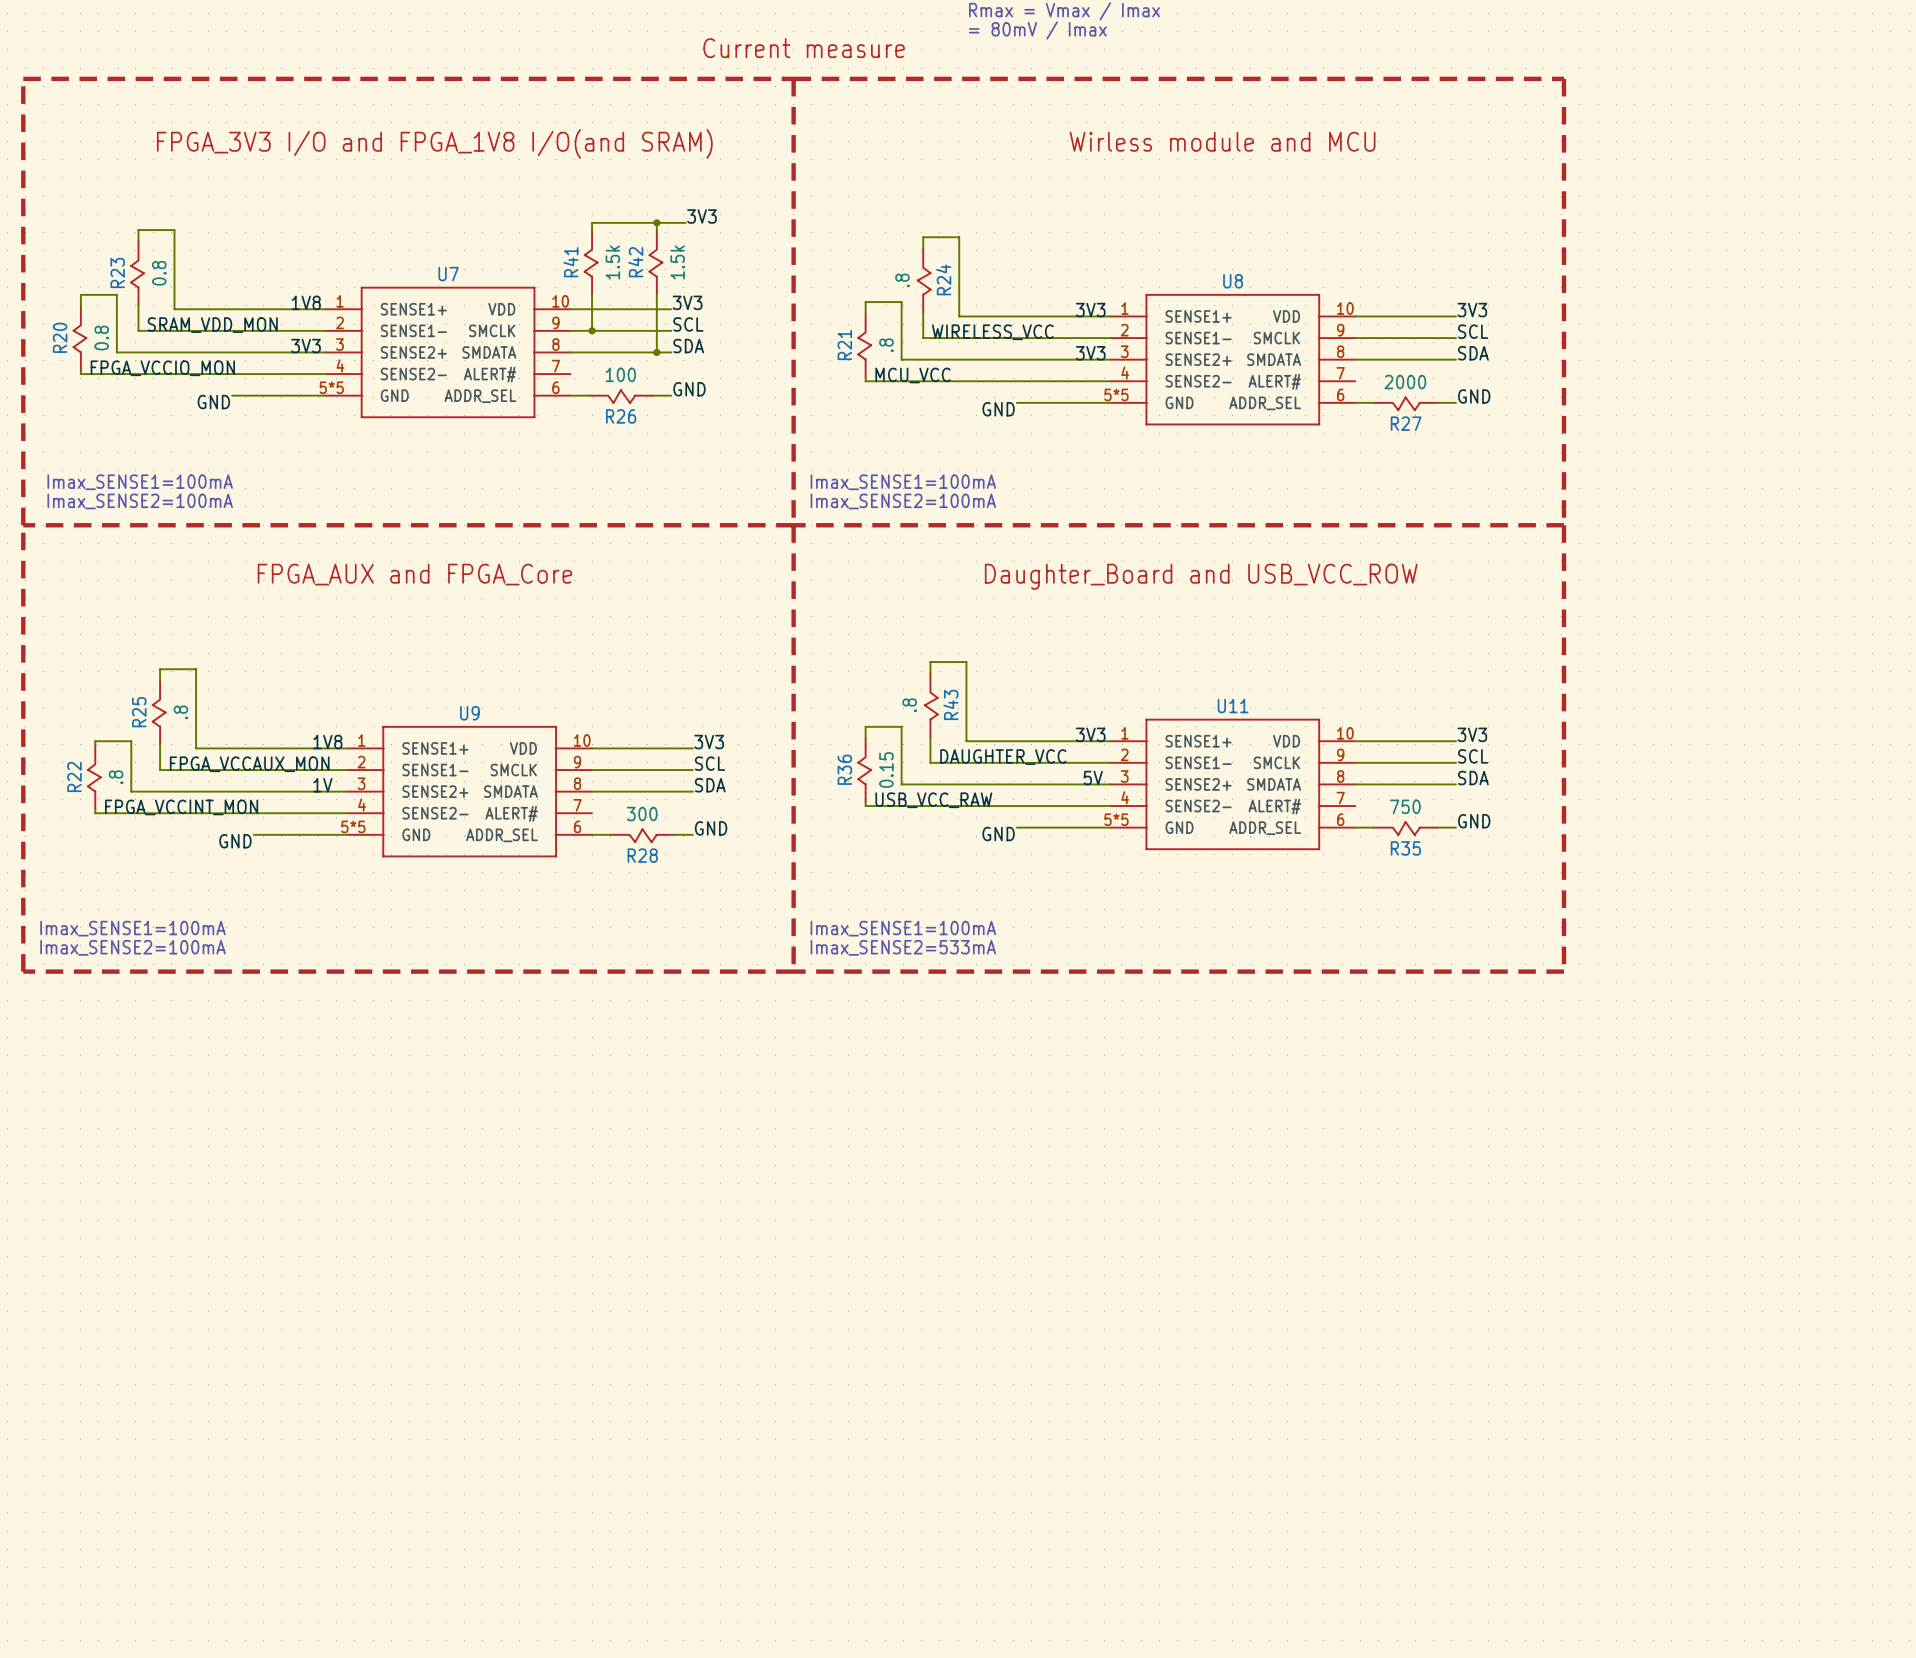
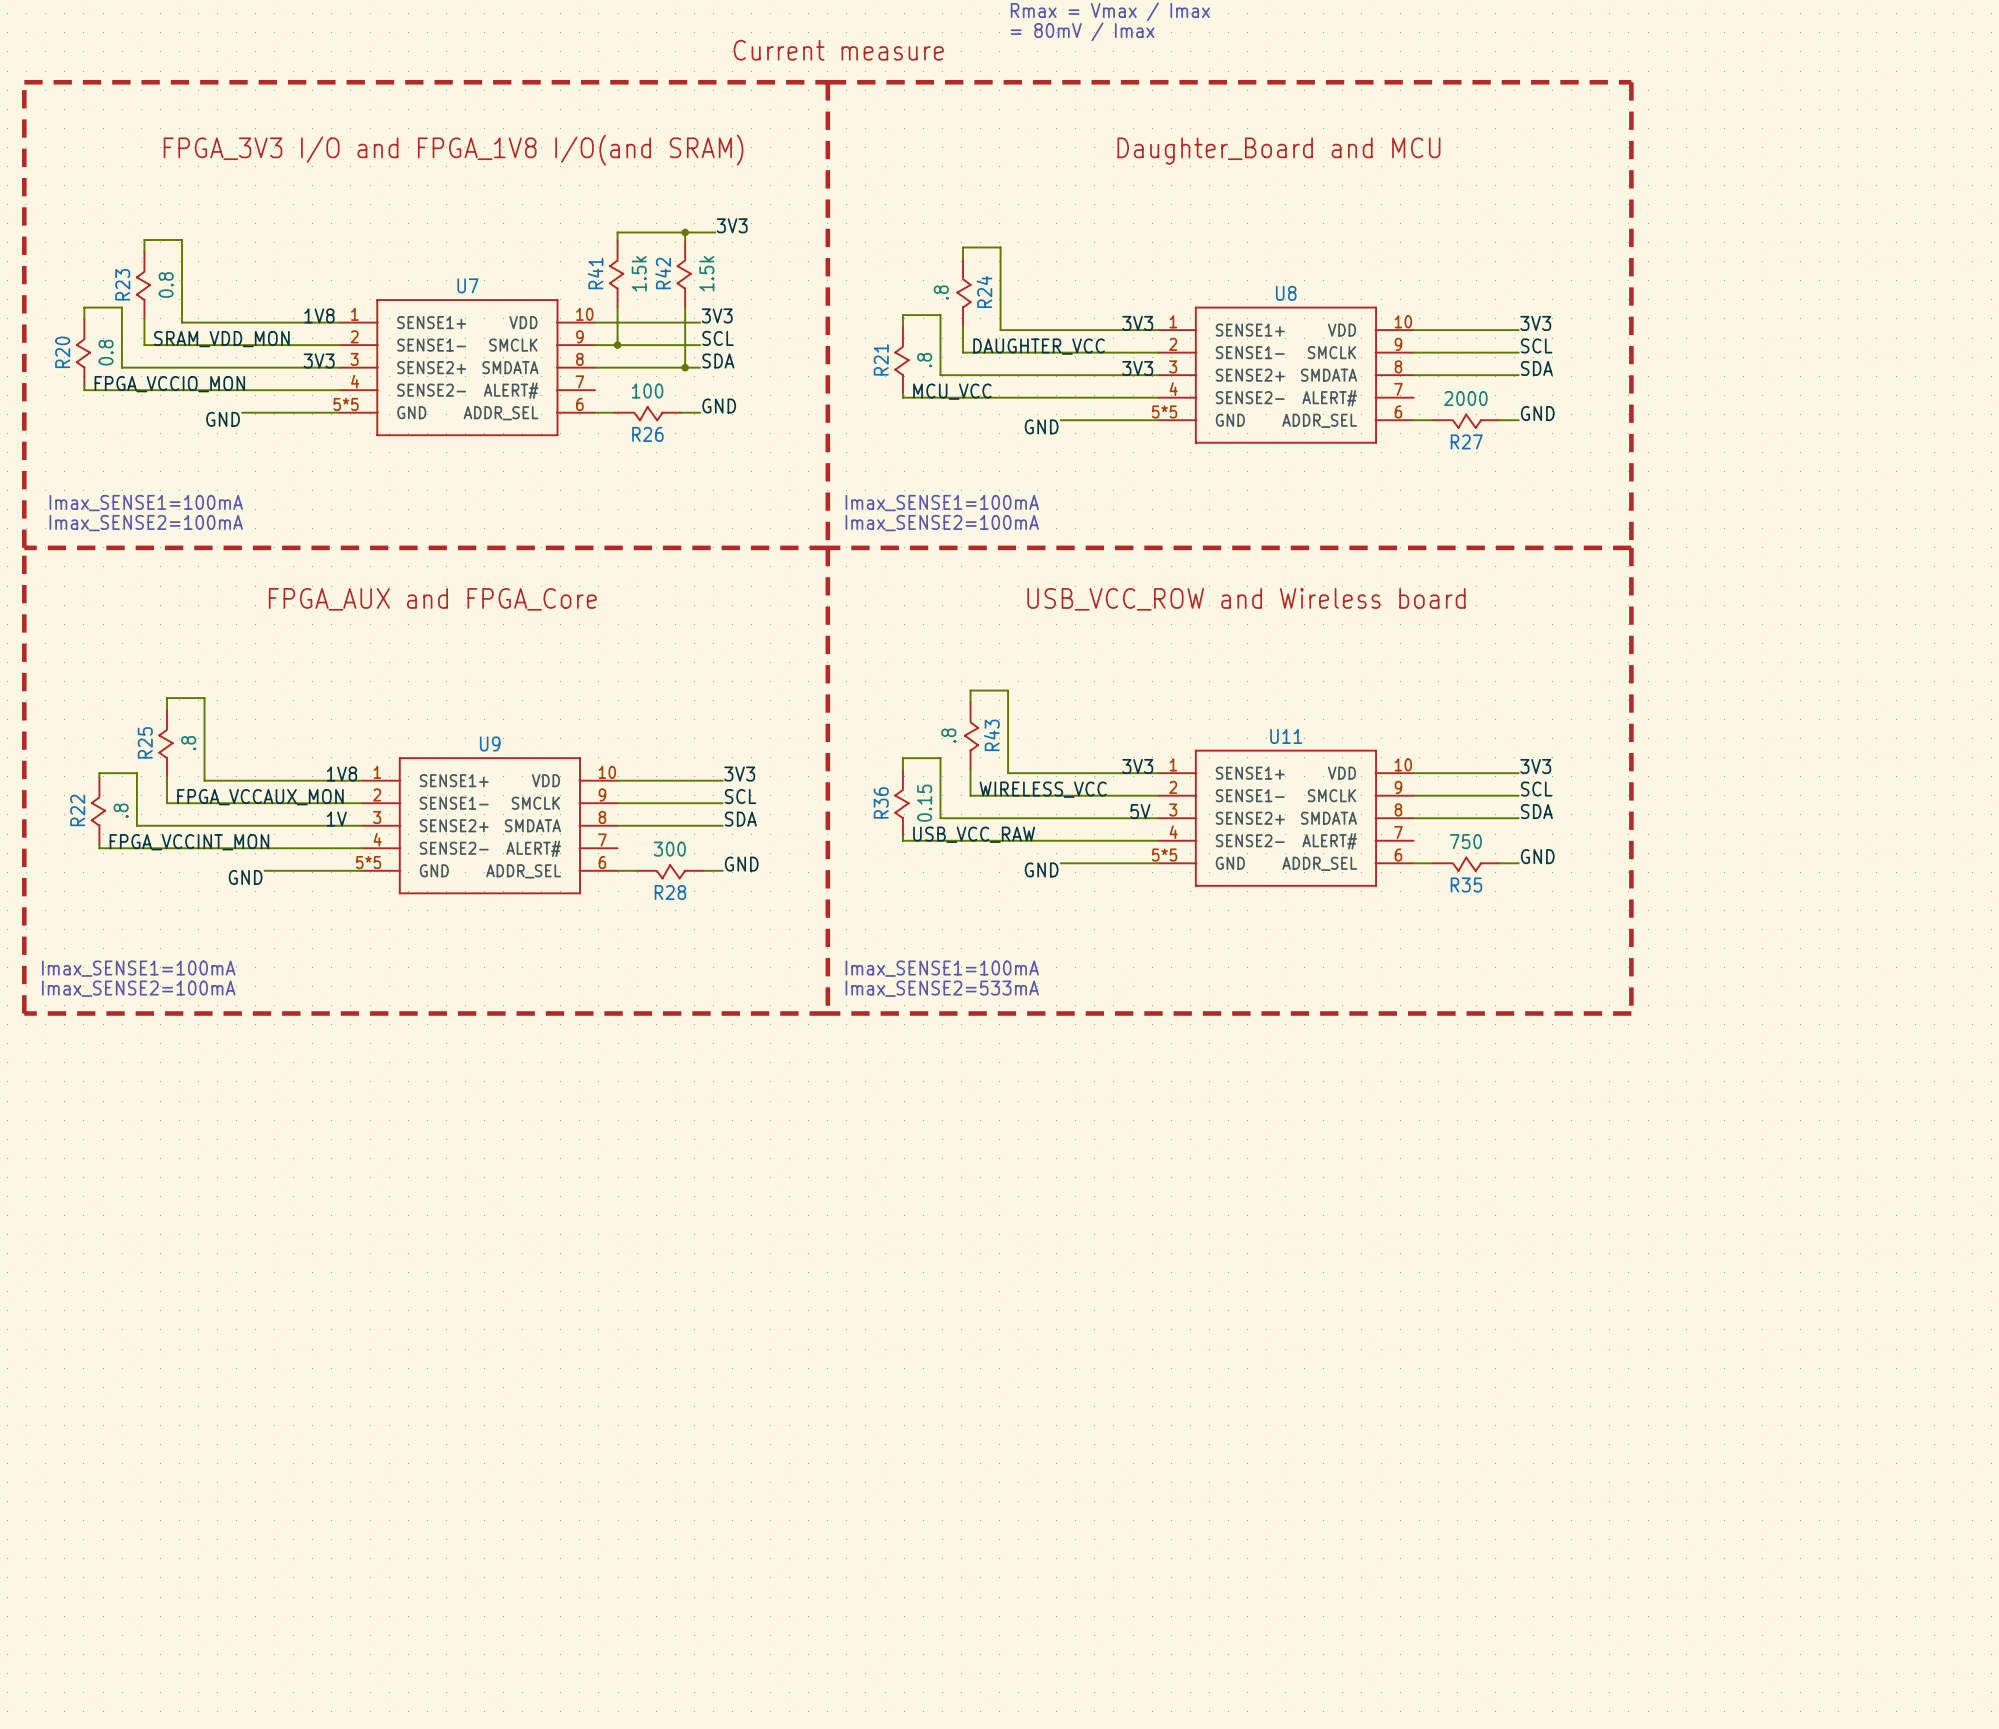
text: Wirless module and MCU (1222, 141) -> Daughter_Board and MCU (1278, 151)
label: WIRELESS_VCC (992, 332) -> DAUGHTER_VCC (1039, 346)
text: Daughter_Board and USB_VCC_ROW (1201, 576) -> USB_VCC_ROW and Wireless board (1246, 599)
label: DAUGHTER_VCC (1003, 757) -> WIRELESS_VCC (1043, 789)

